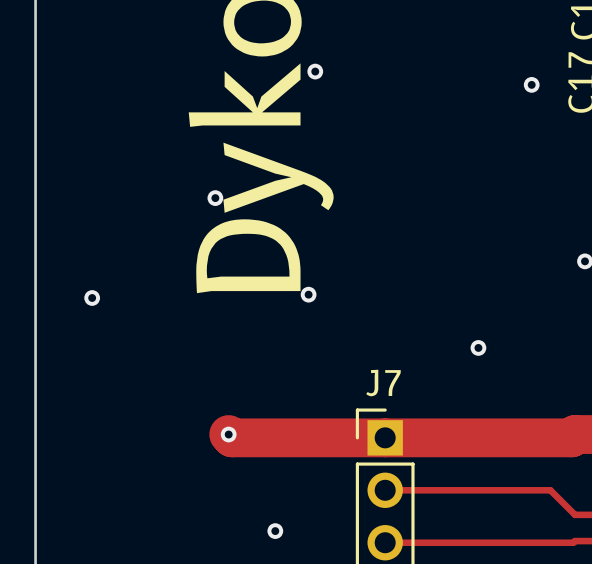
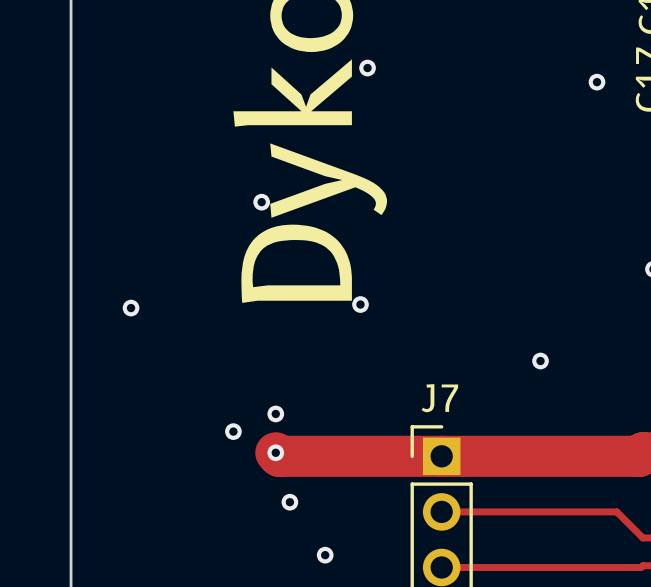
via: none -> (275, 413)
via: none -> (233, 431)
via: none -> (289, 502)

